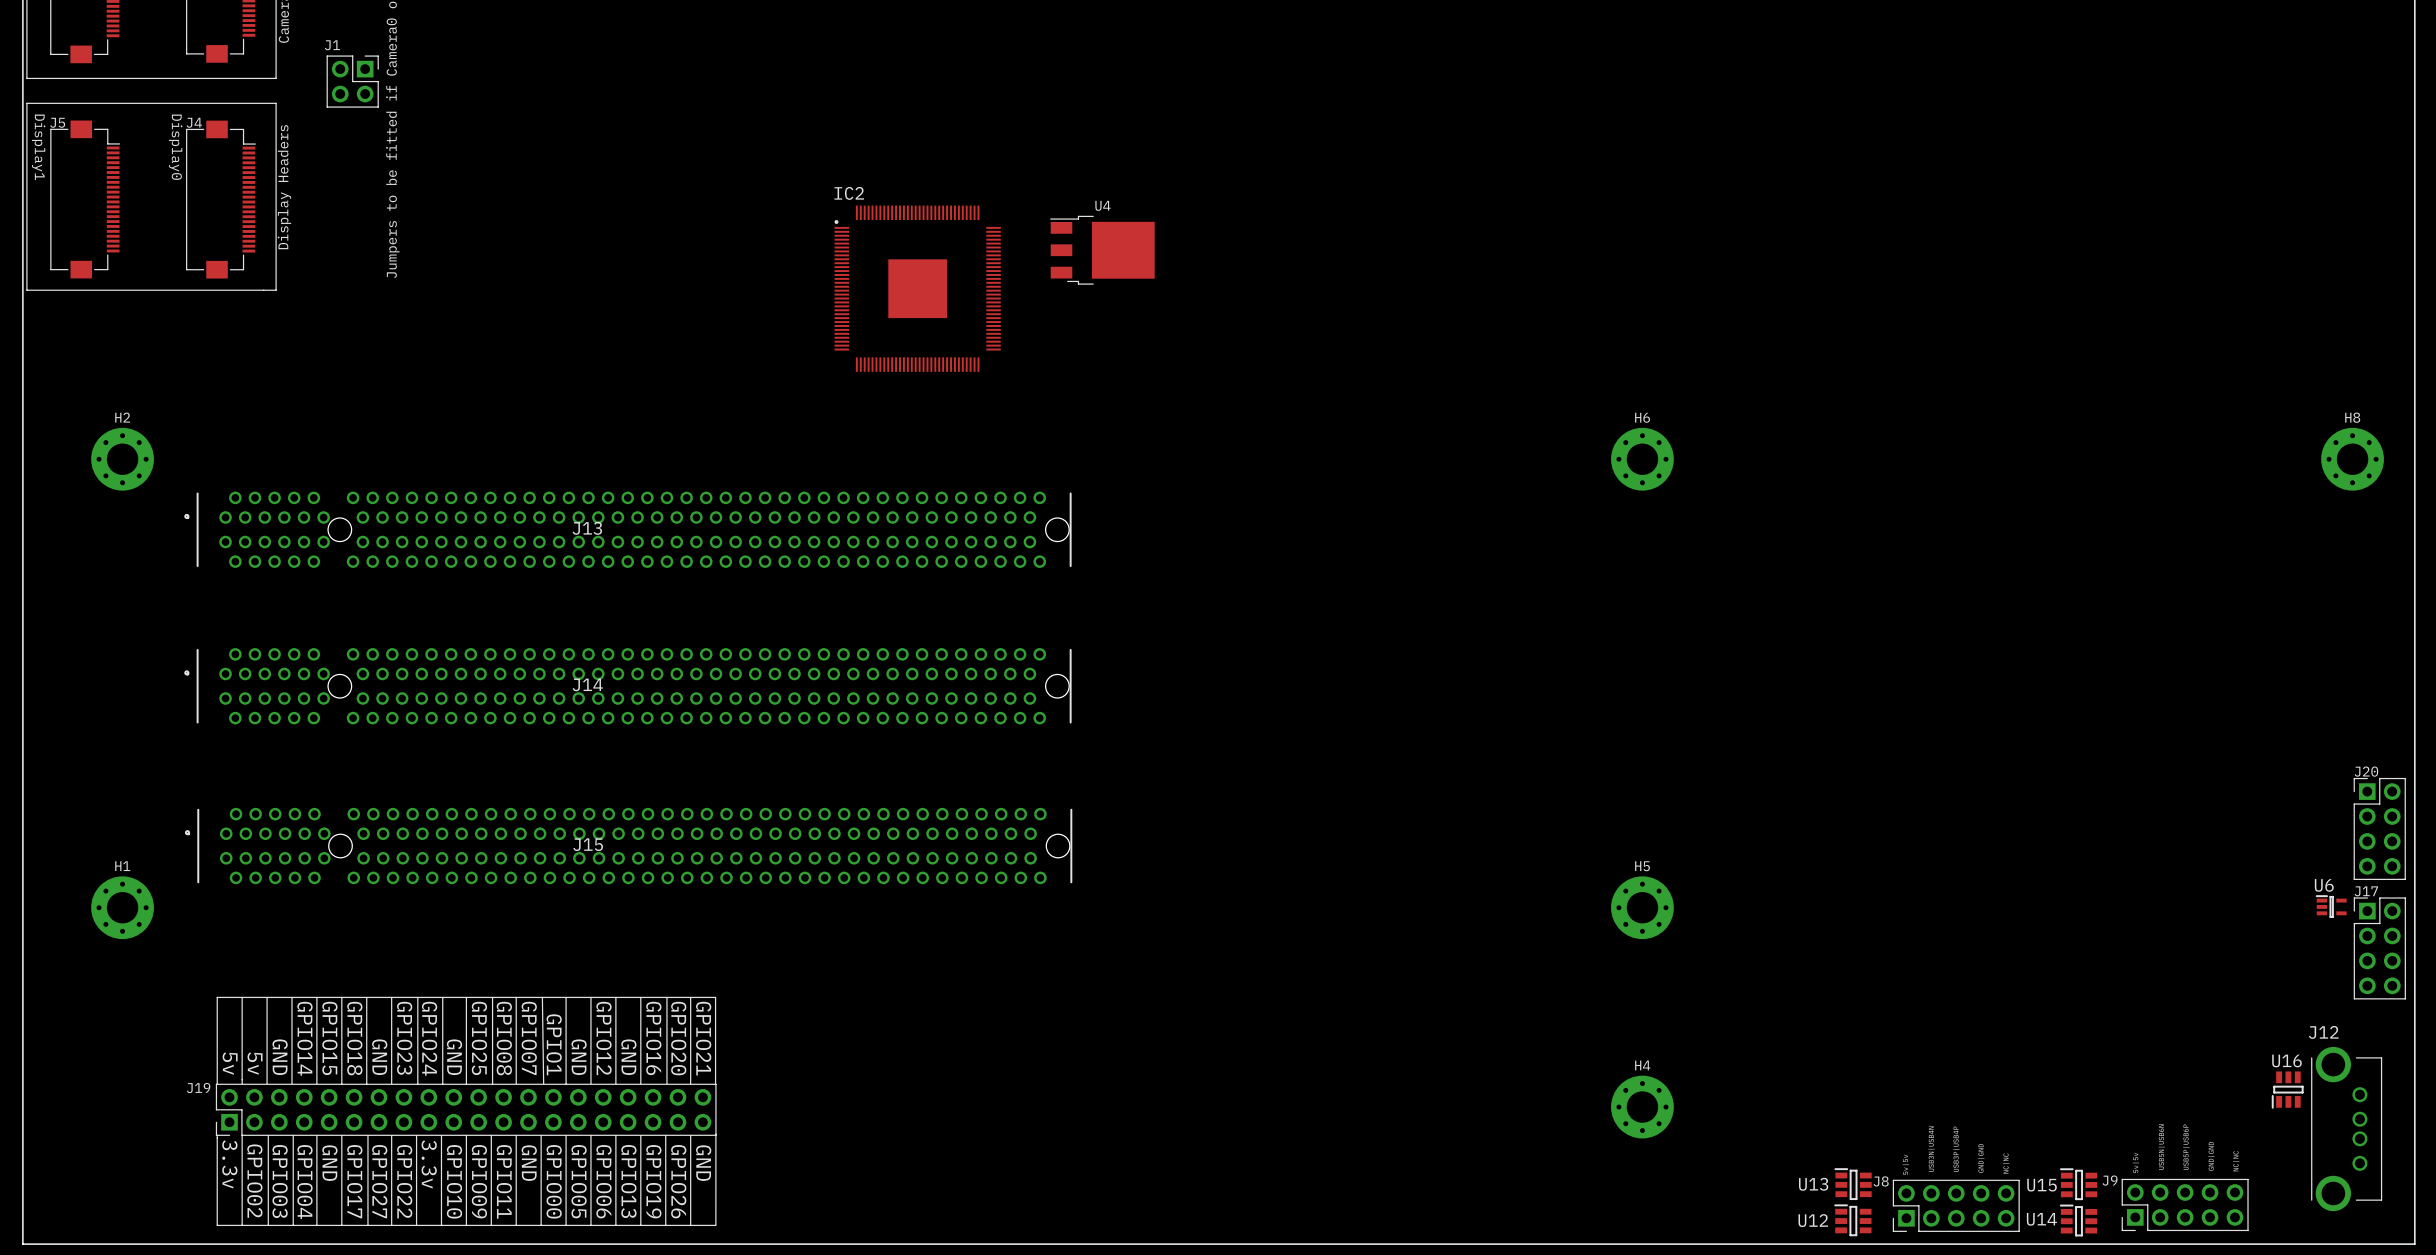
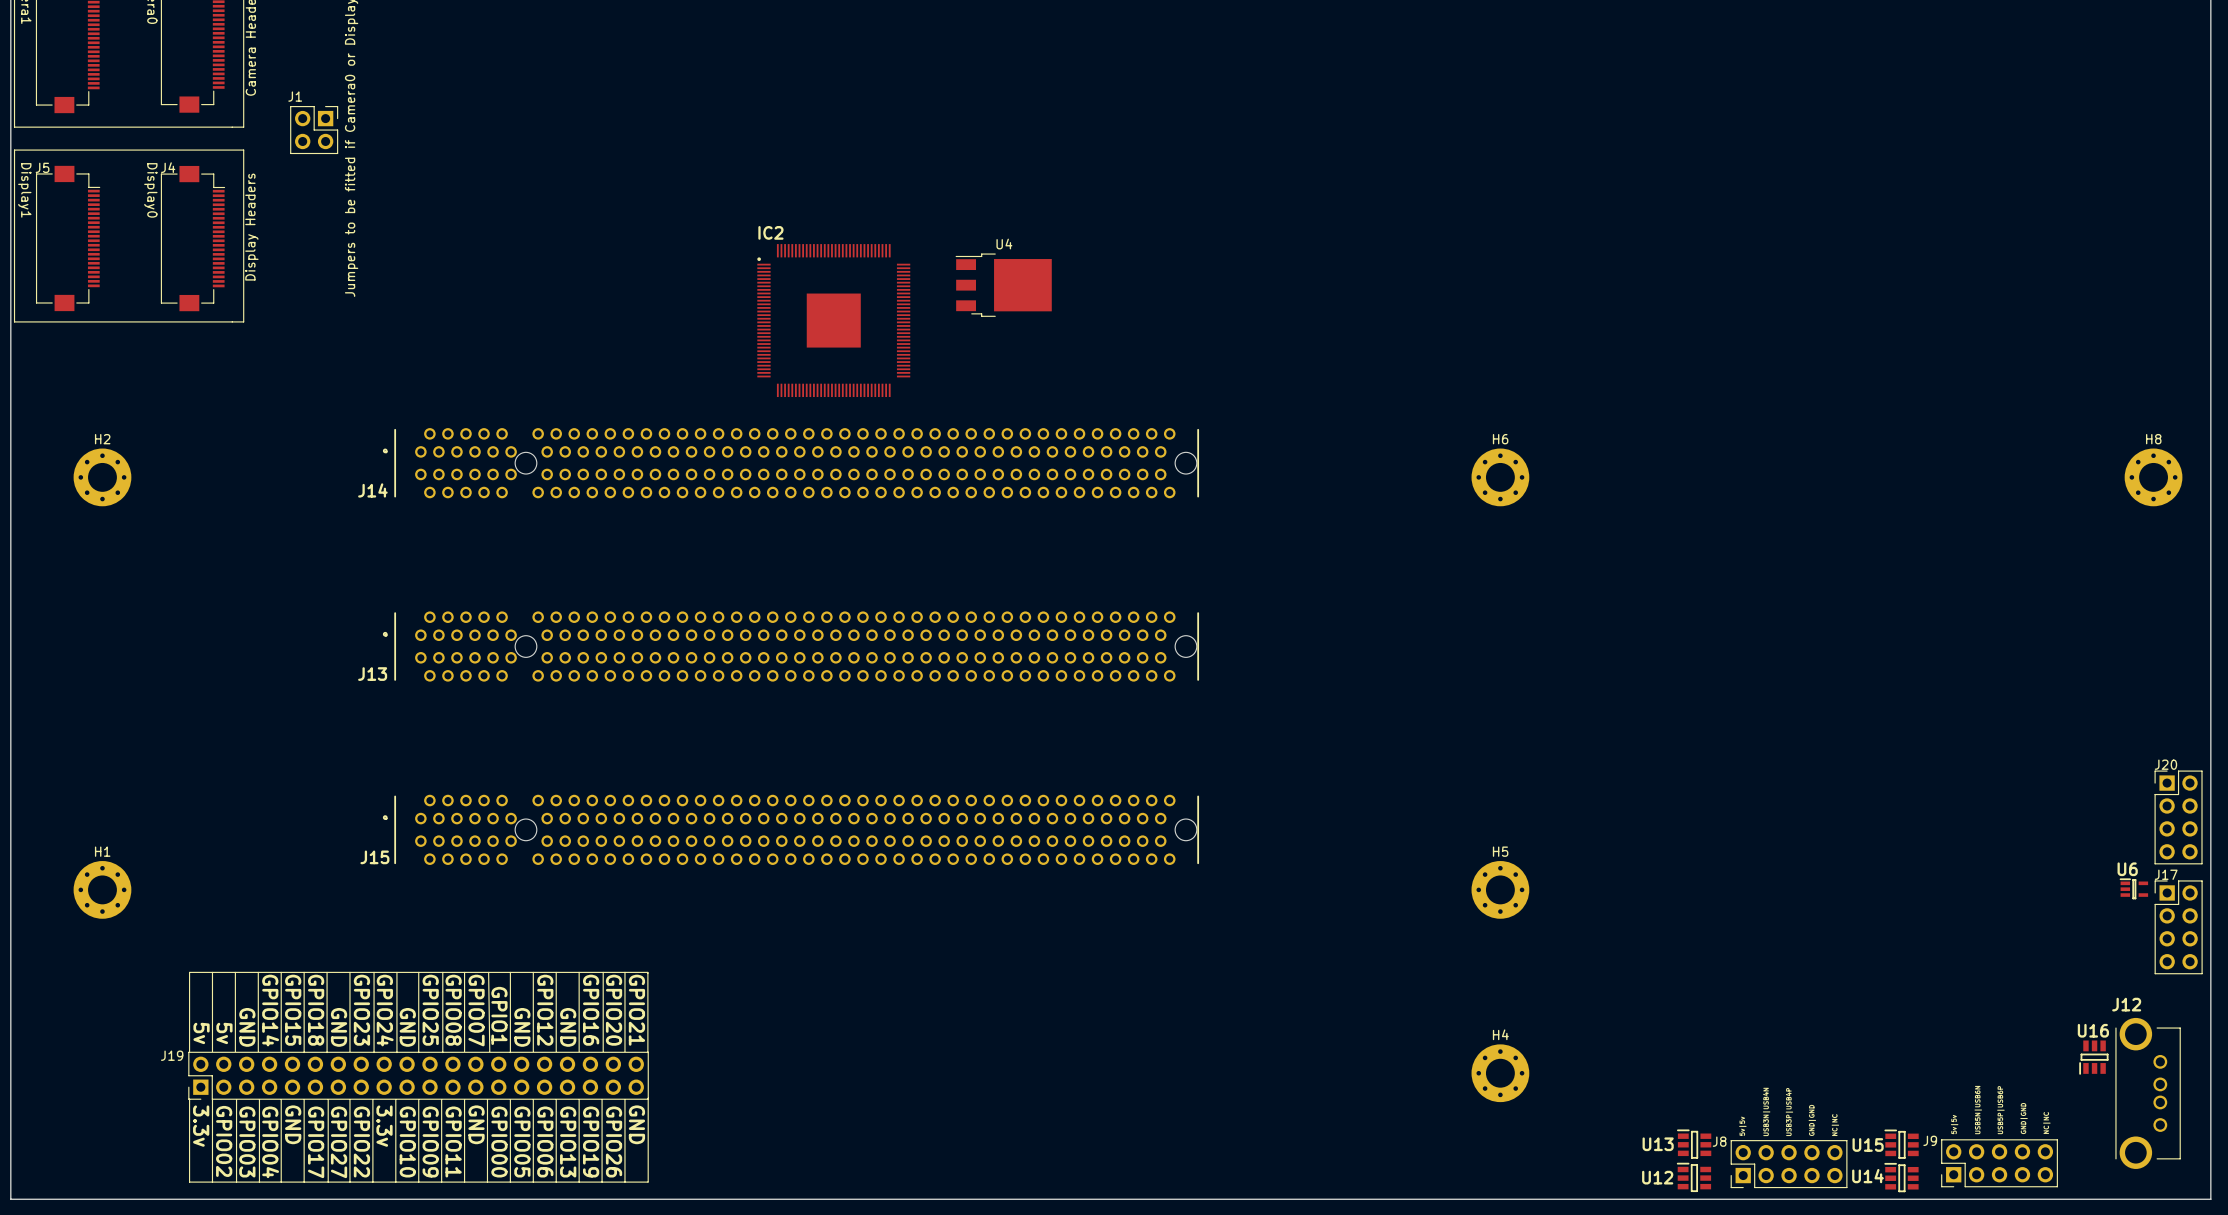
J13 name position: J13 (587, 528) -> J13 (372, 674)
J13 position: (627, 529) -> (790, 646)
J14 name position: J14 (587, 684) -> J14 (372, 490)
J14 position: (627, 686) -> (790, 463)
J15 name position: J15 (588, 844) -> J15 (374, 857)
J15 position: (628, 846) -> (790, 829)

